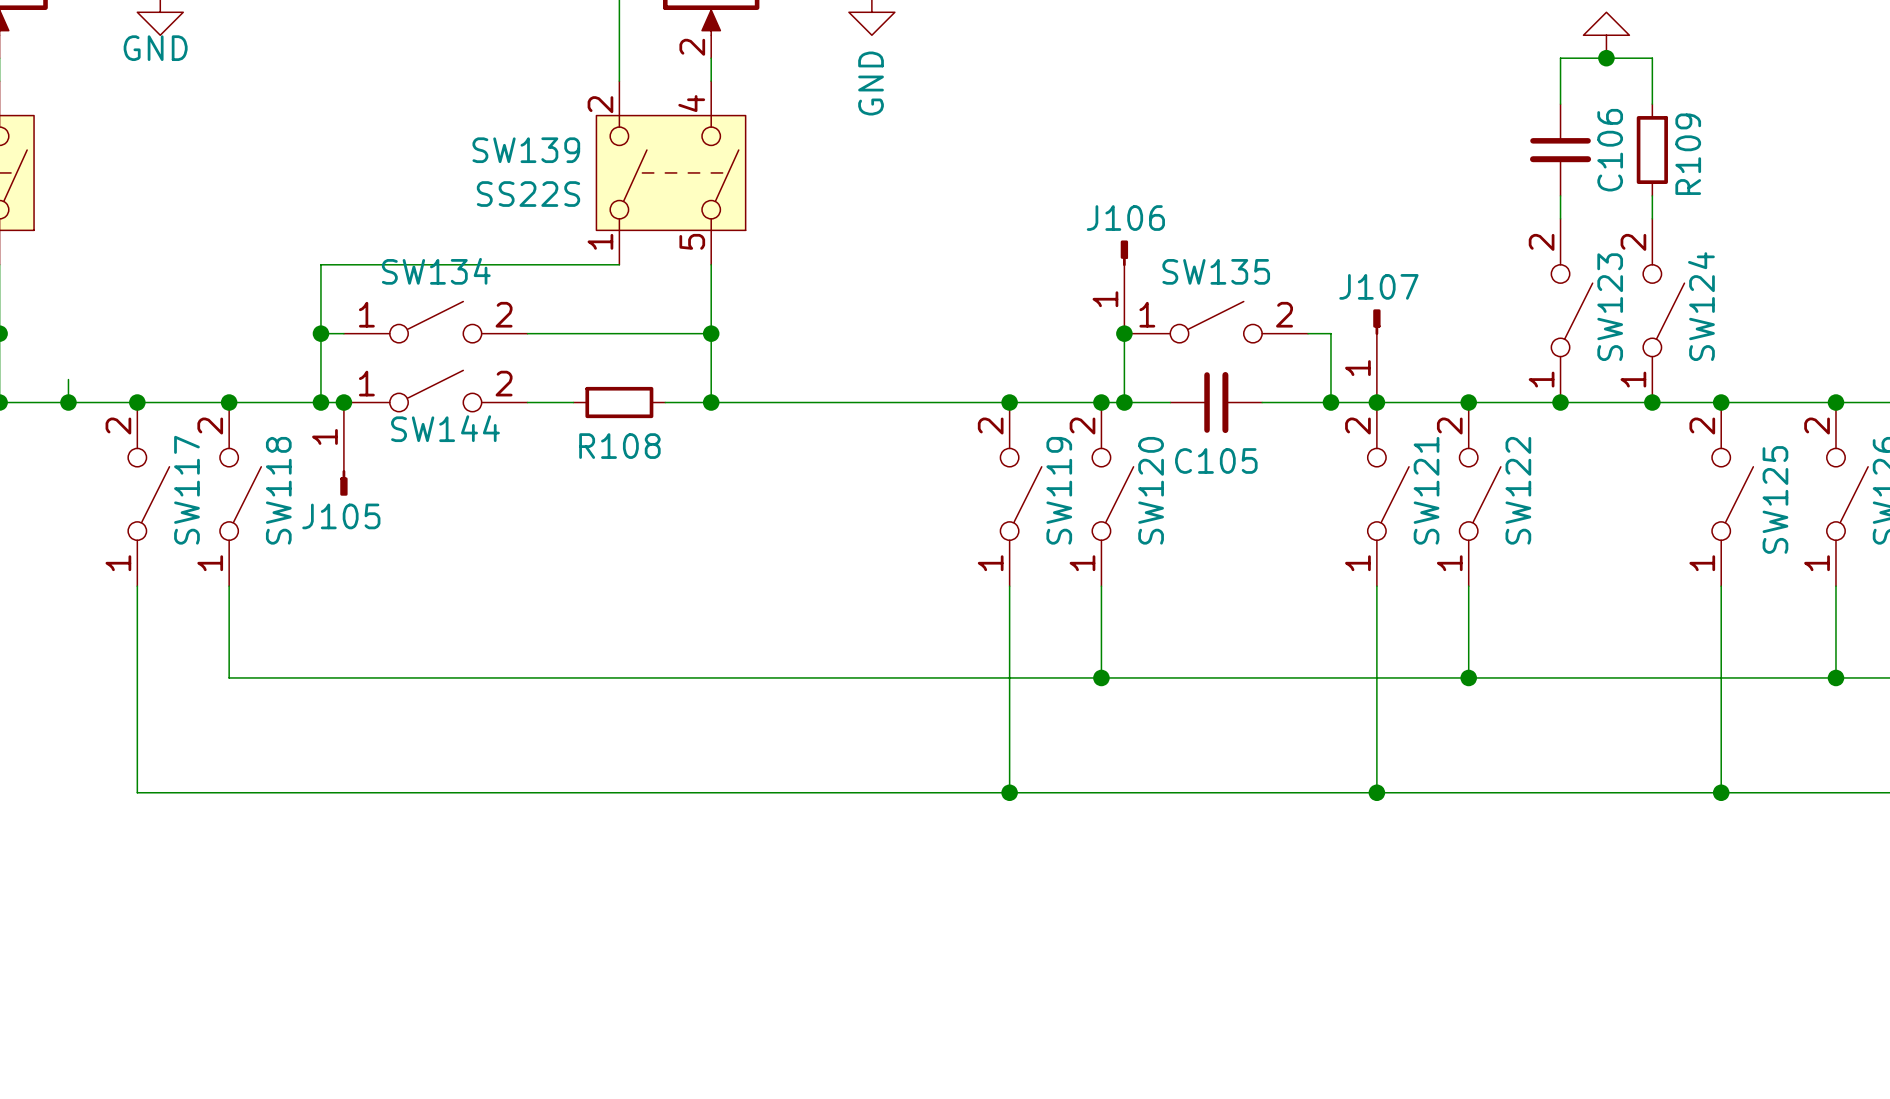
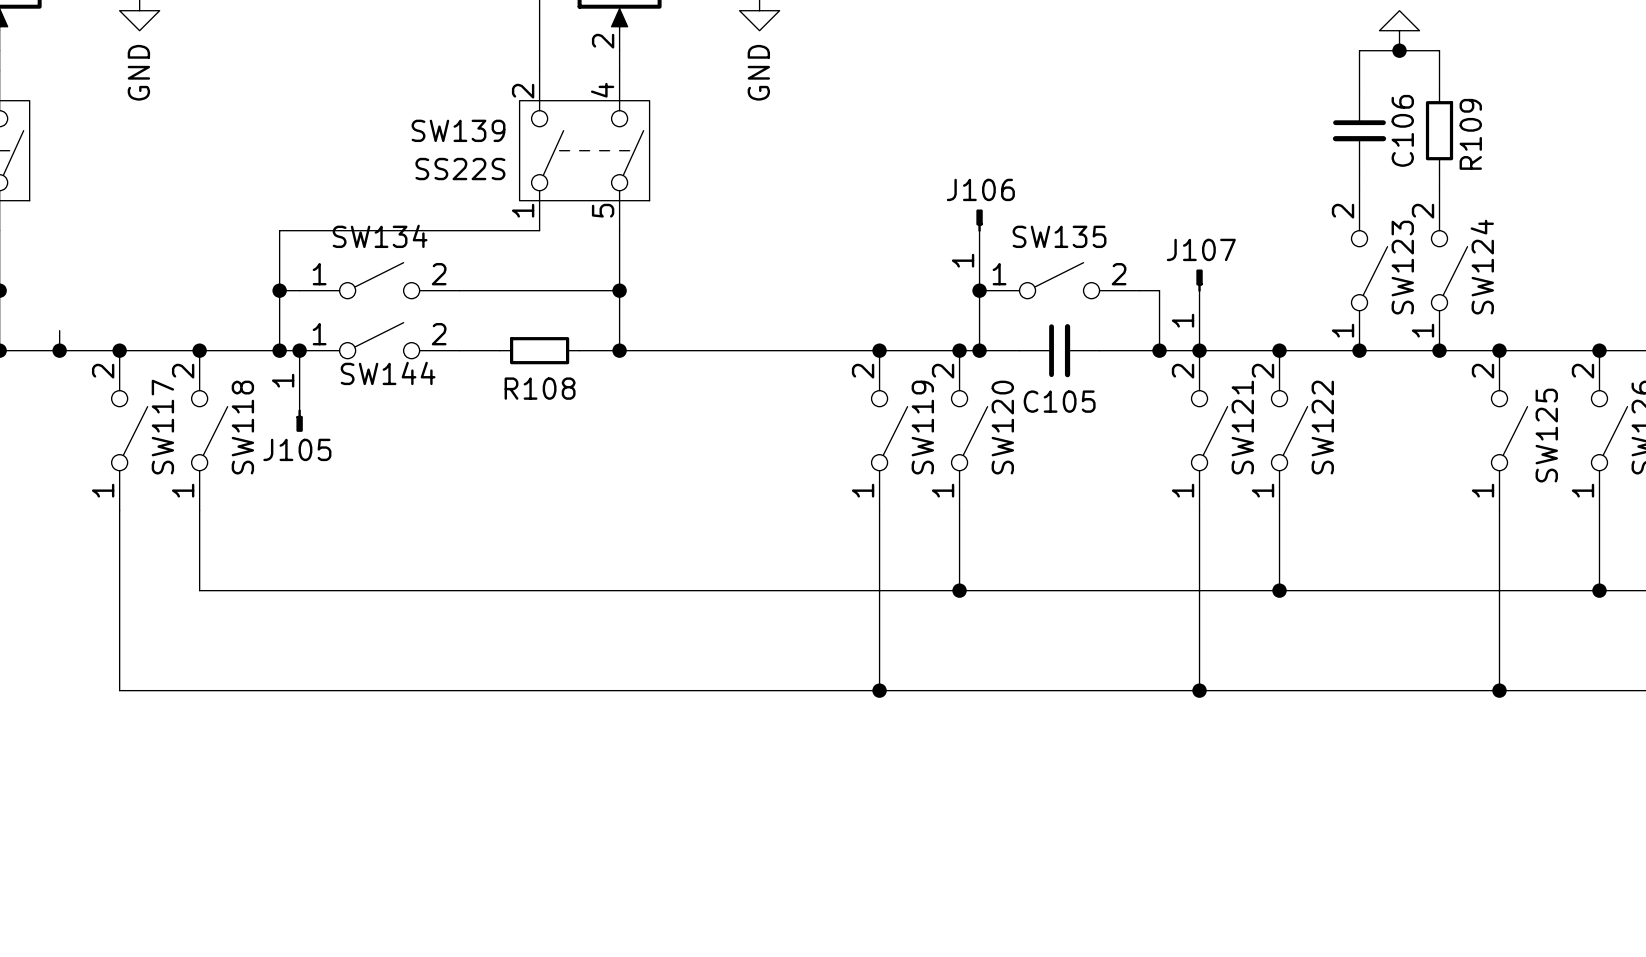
power symbol text rotation: 0° (155, 48) -> 90° counterclockwise (138, 72)

